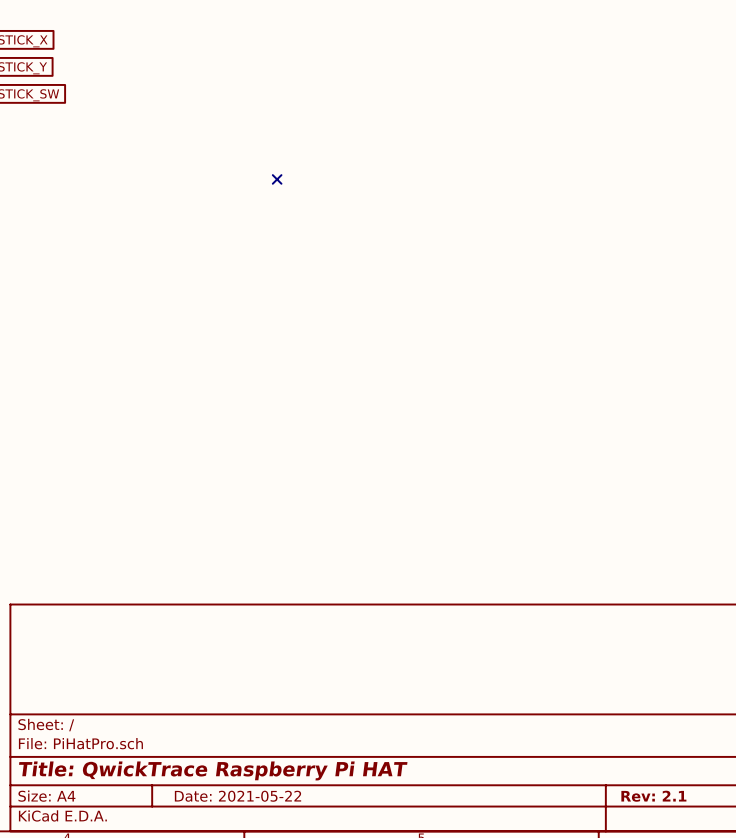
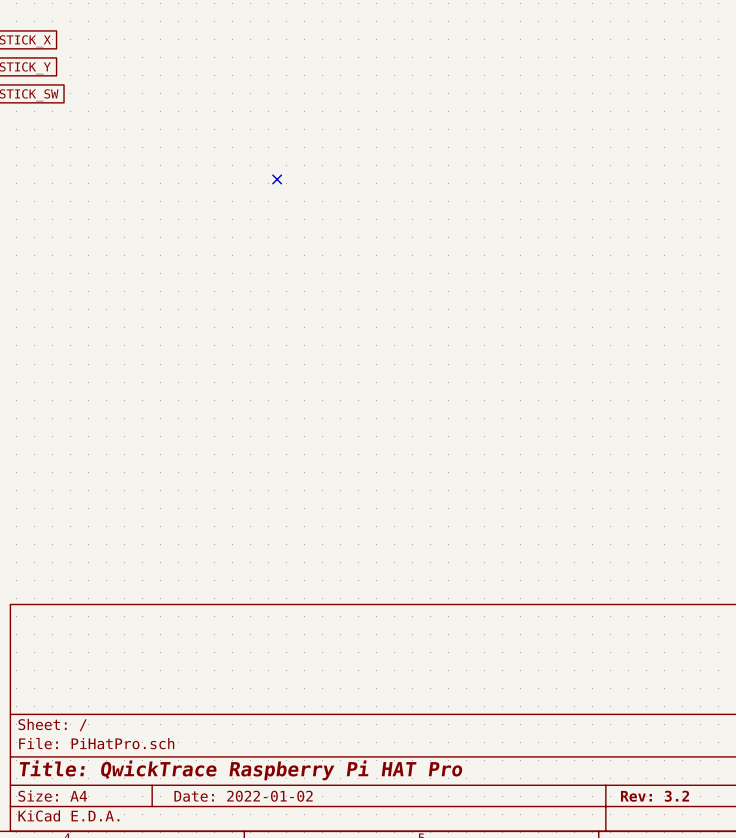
title block: Title: QwickTrace Raspberry Pi HAT (213, 770) -> Title: QwickTrace Raspberry Pi HAT Pro (241, 770)
title block: Date: 2021-05-22 (238, 796) -> Date: 2022-01-02 (243, 796)
title block: Rev: 2.1 (653, 796) -> Rev: 3.2 (655, 796)

